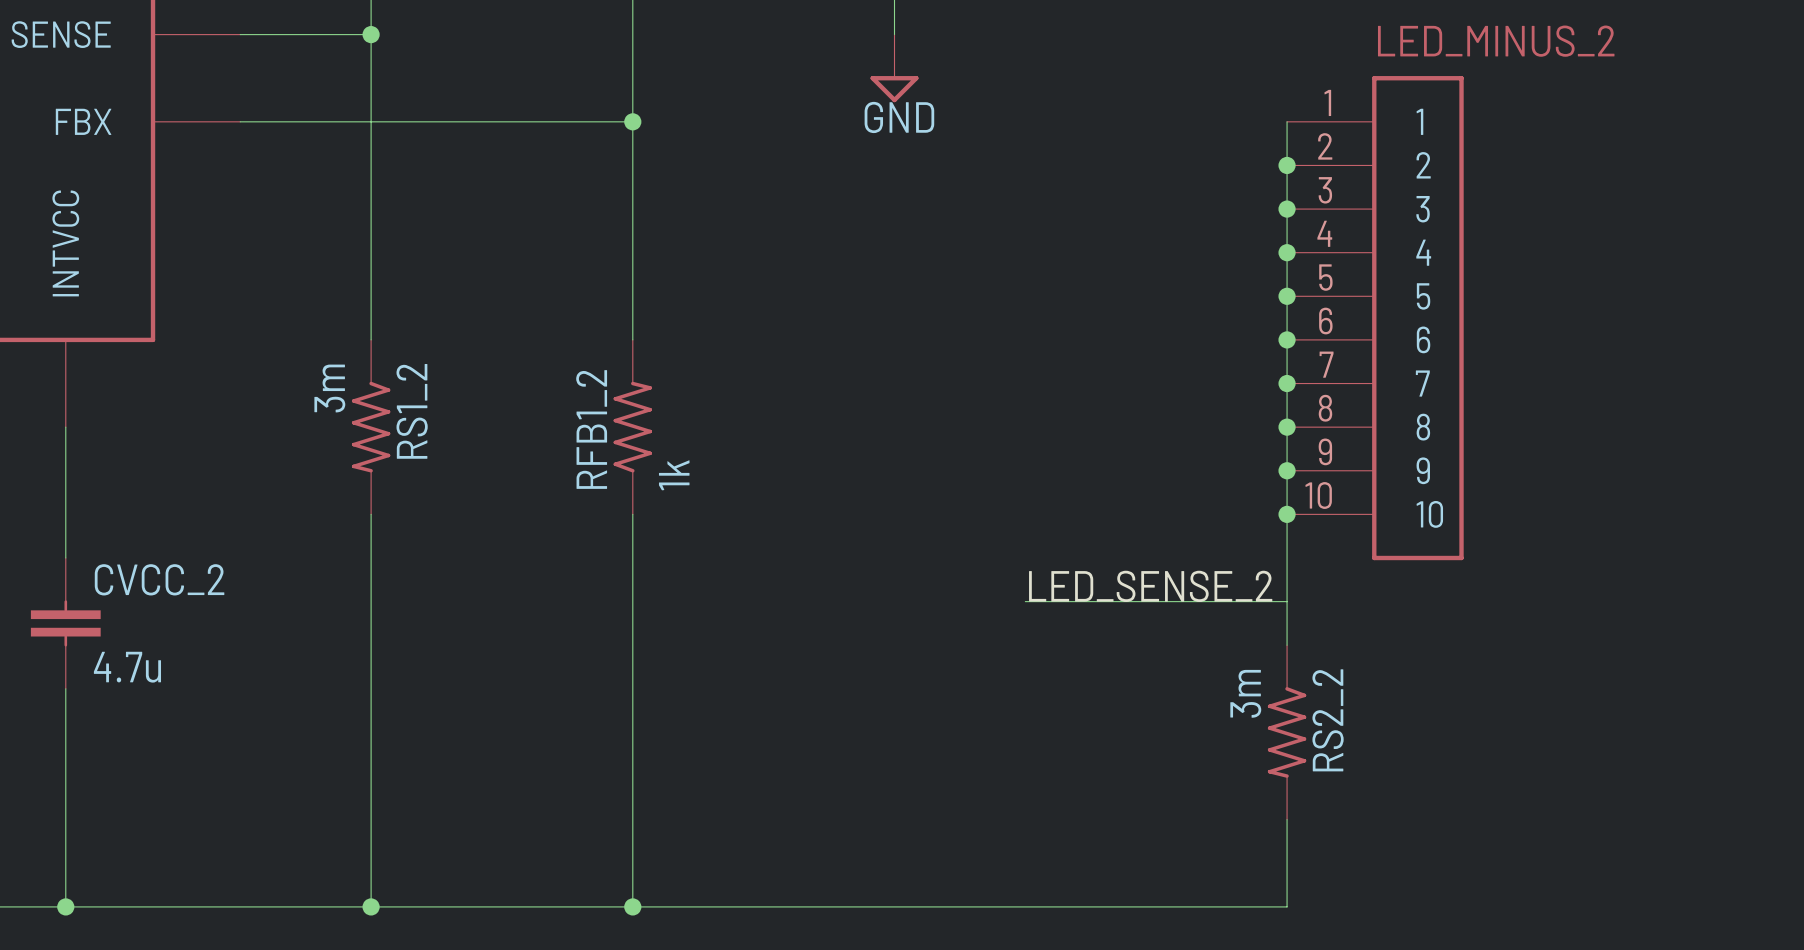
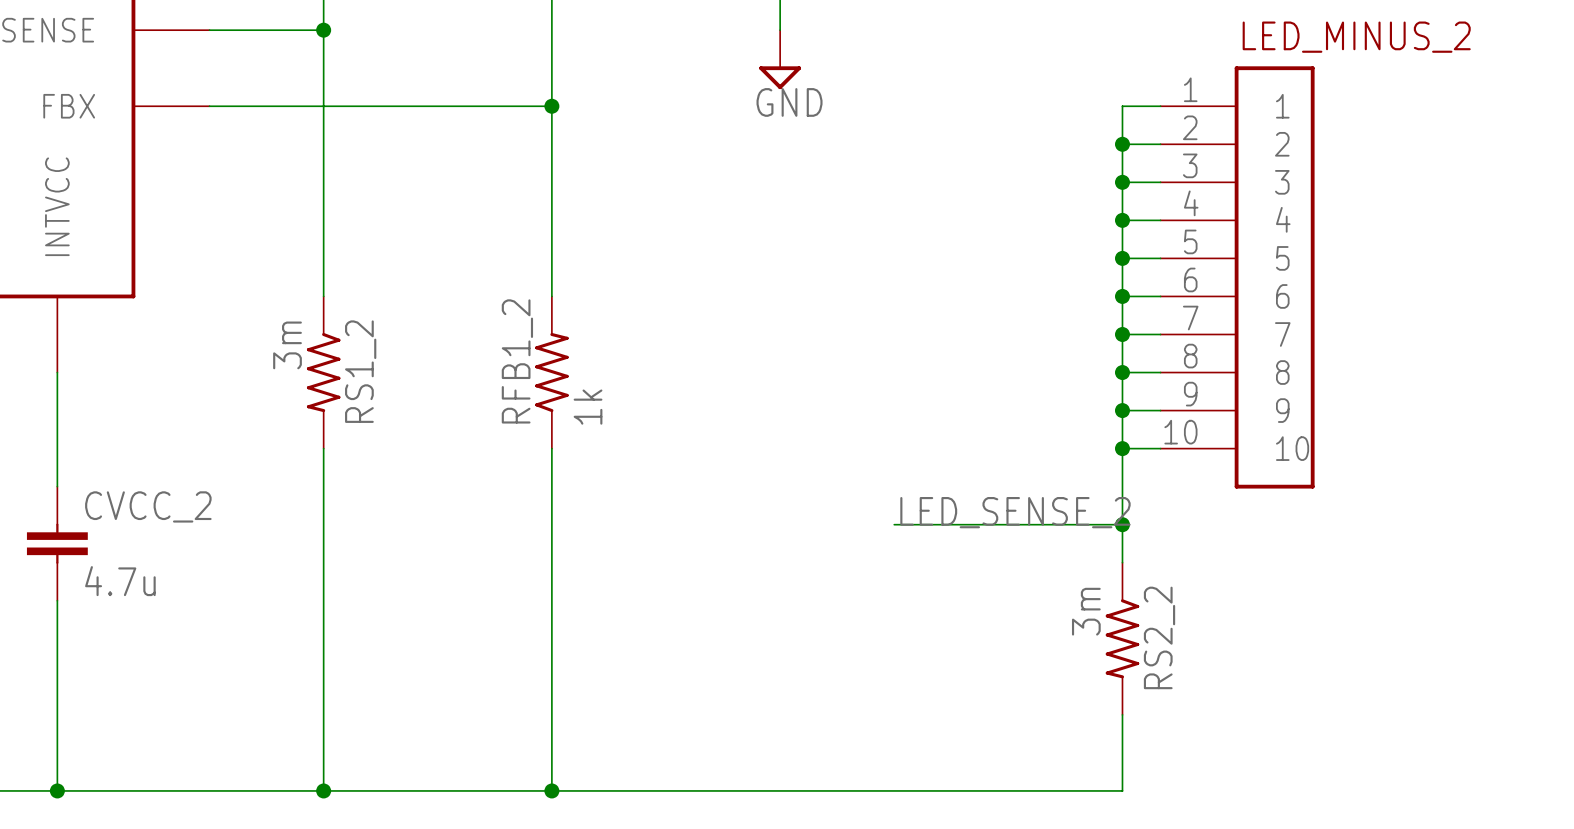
LED_MINUS_2 position: (1375, 318) -> (1237, 277)
junction: none -> (1122, 524)

